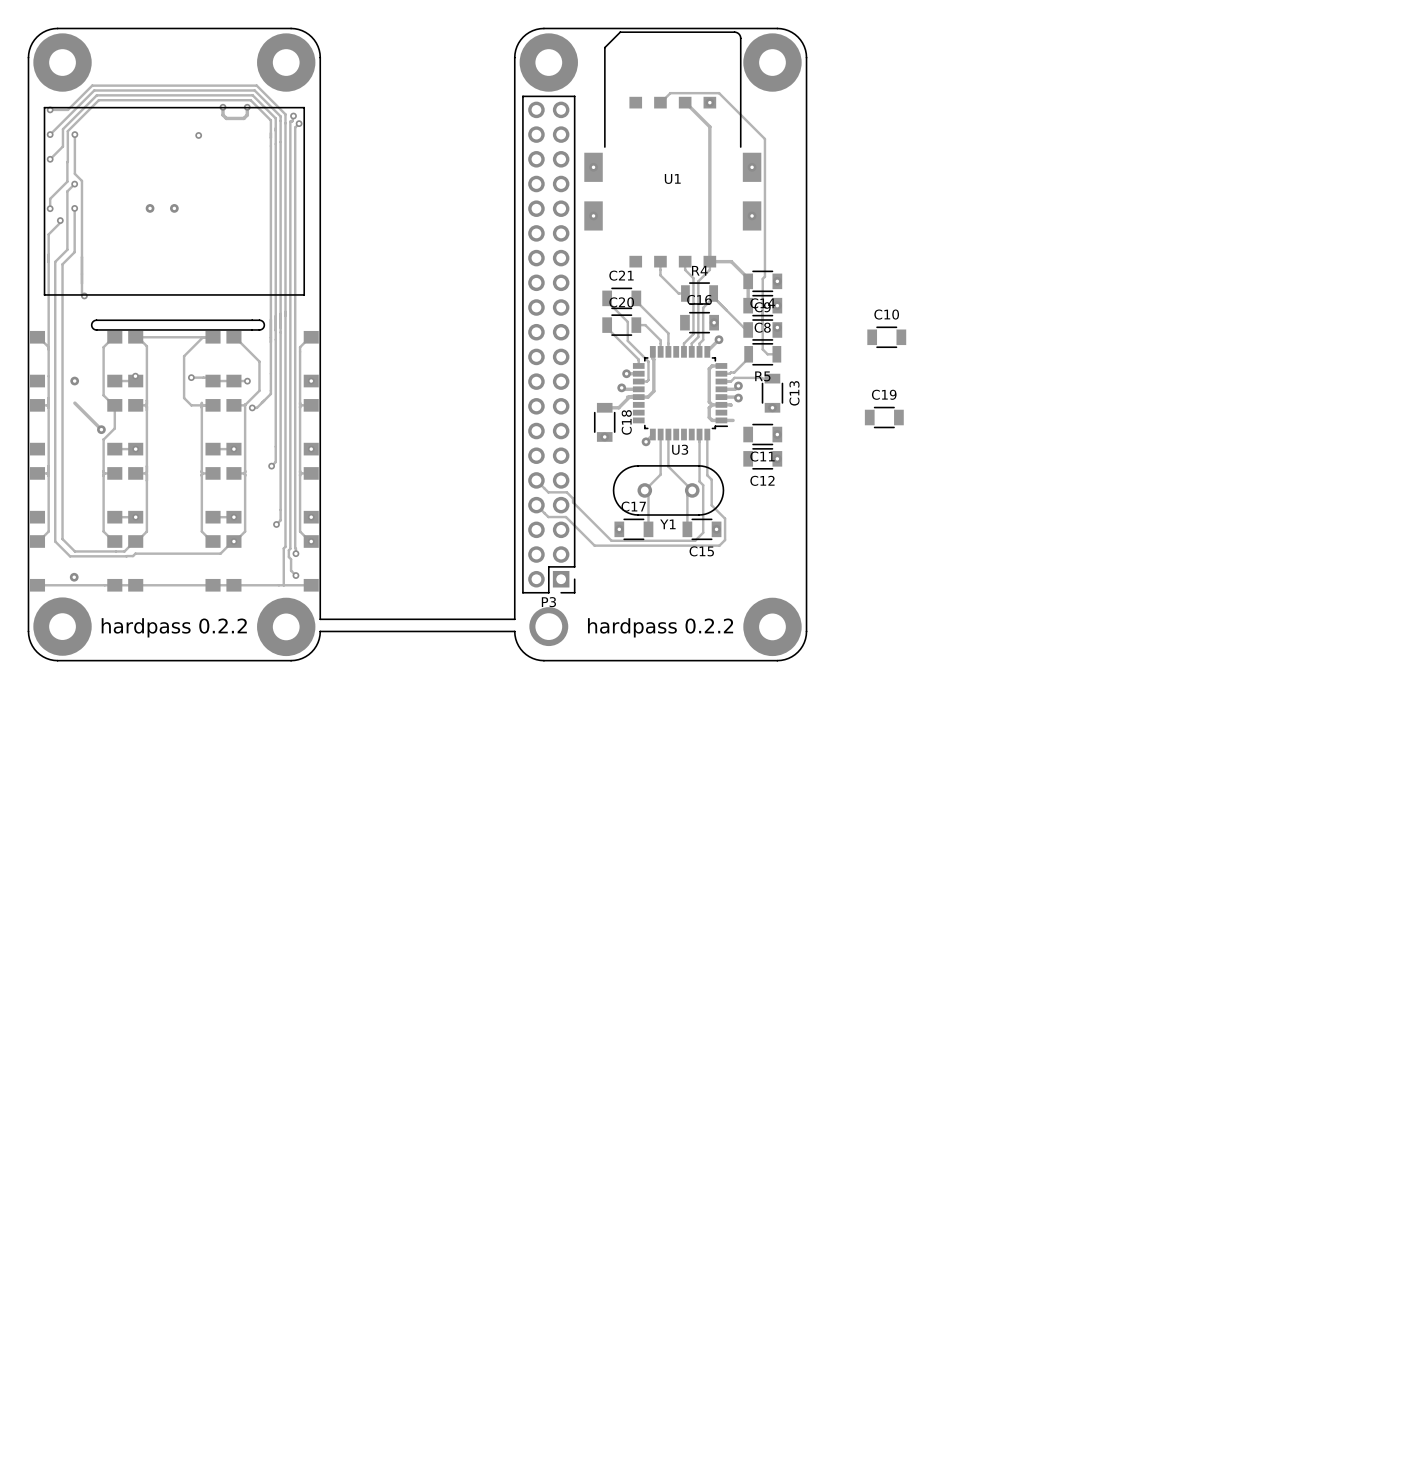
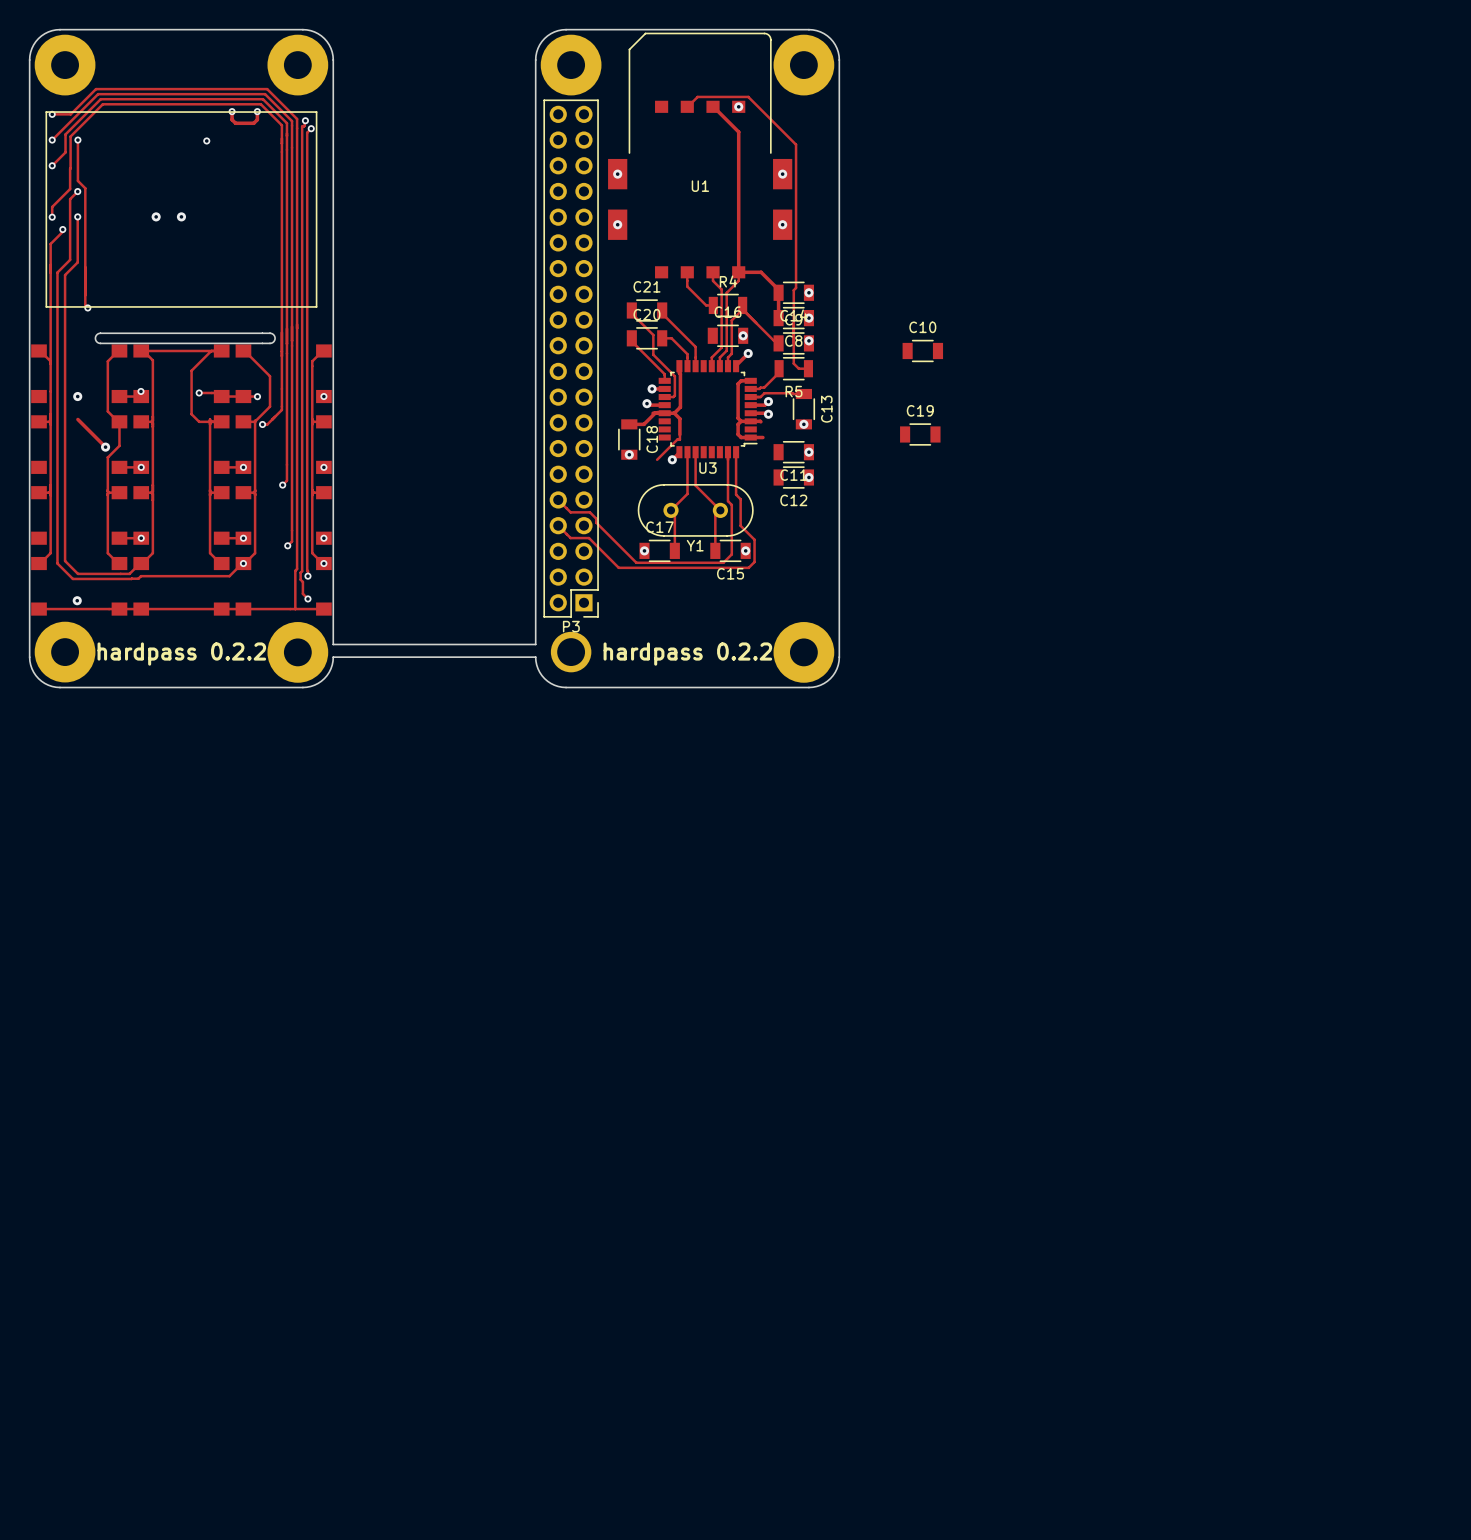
track: none -> (674, 413) (679, 418) (679, 439) (677, 439) (657, 459)

